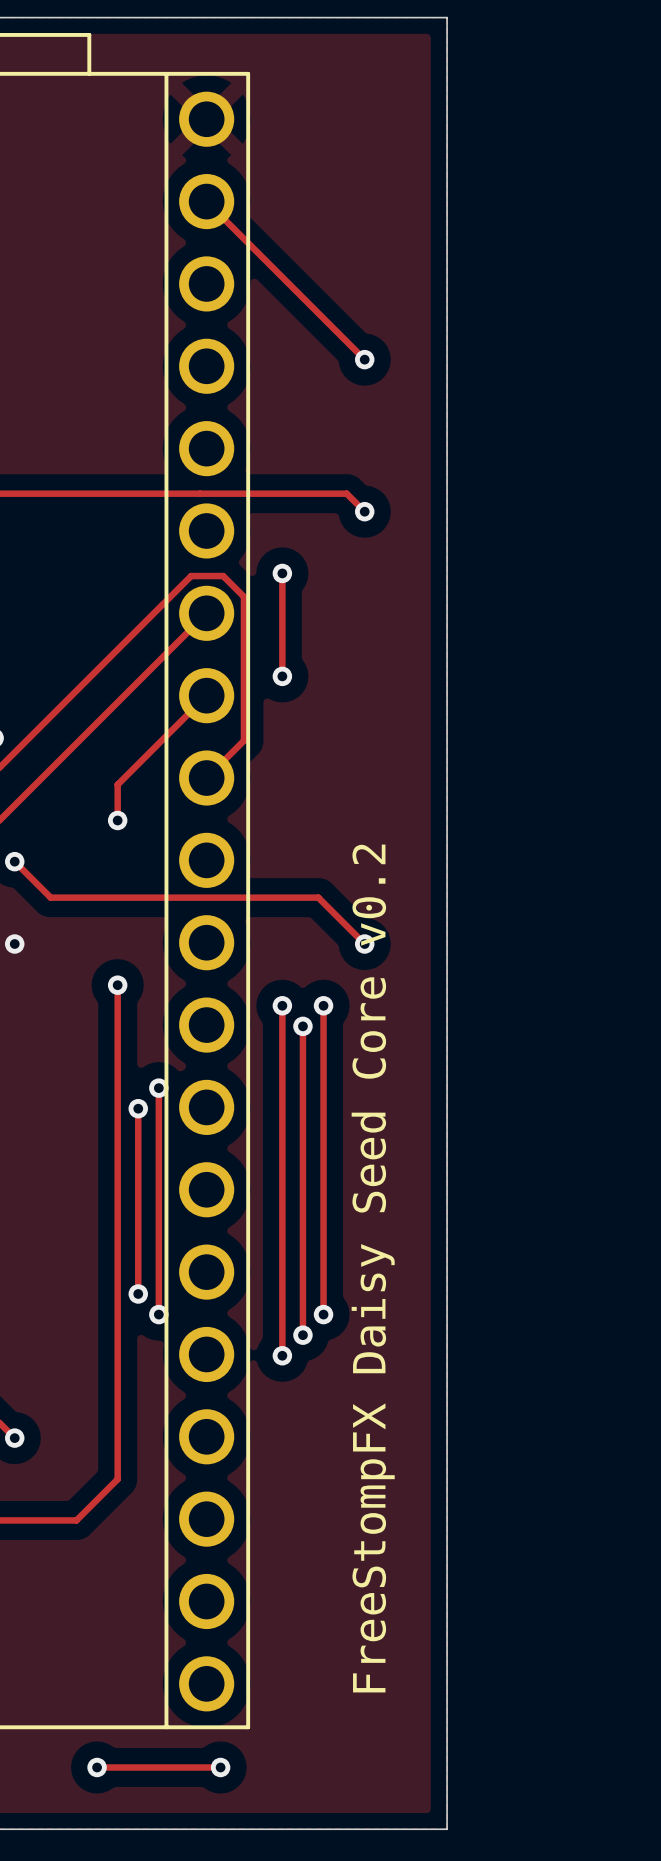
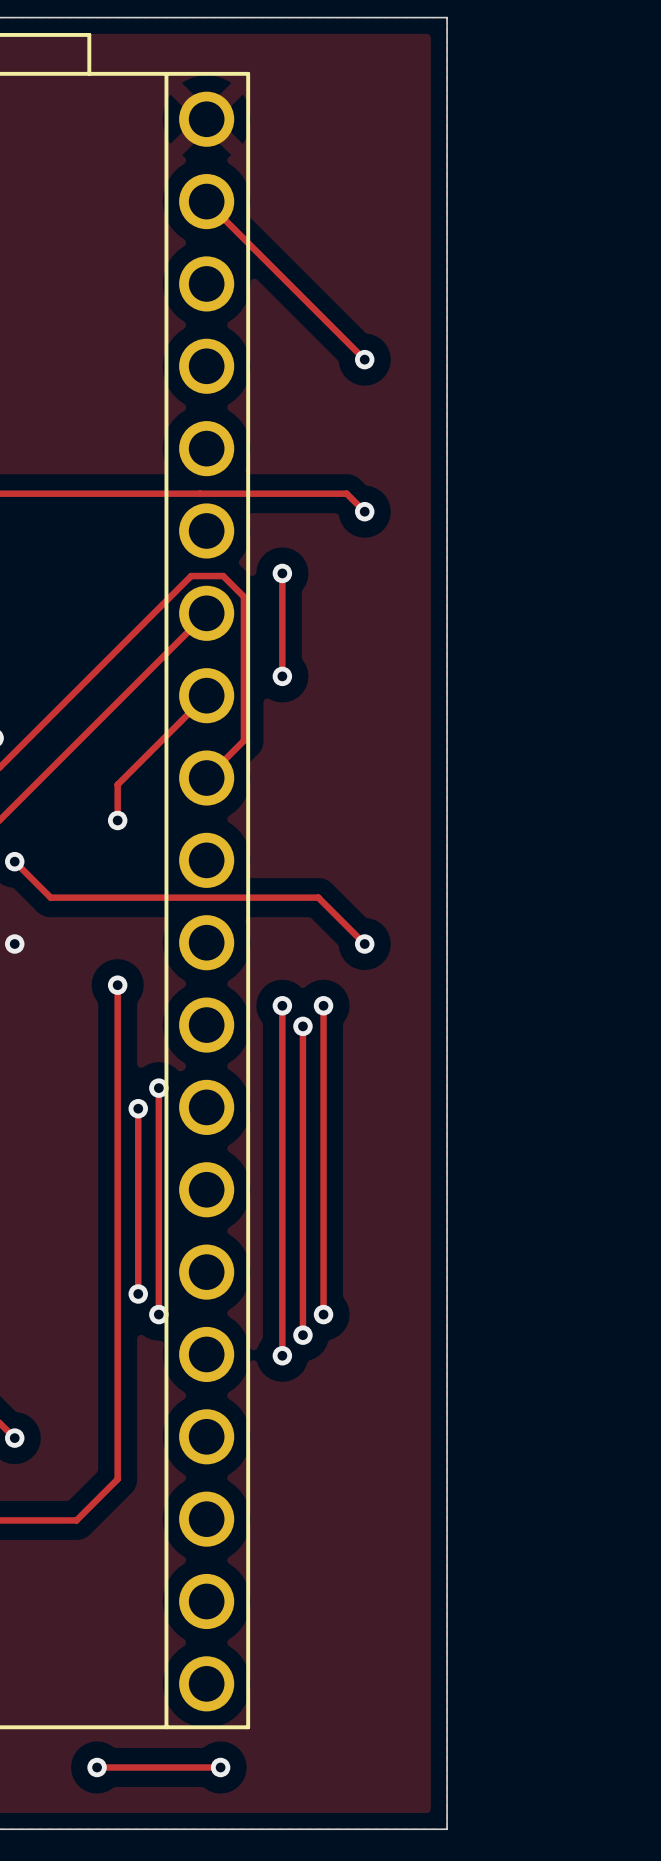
text: FreeStompFX Daisy Seed Core v0.2 (373, 1268) -> none

